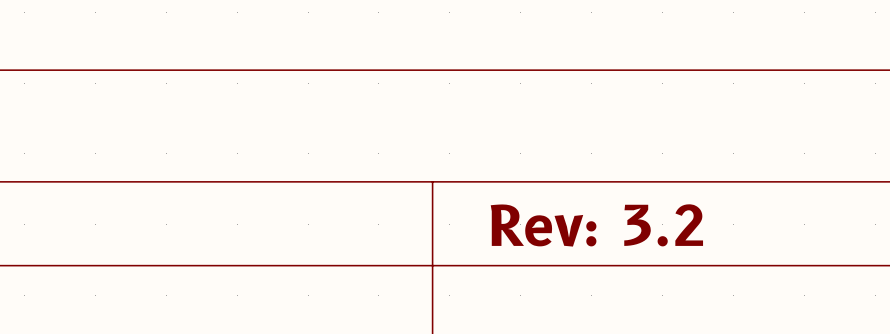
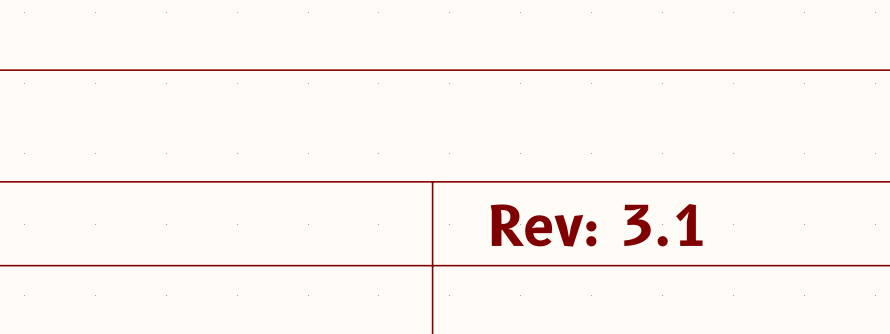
title block: Rev: 3.2 (596, 225) -> Rev: 3.1 (596, 225)

